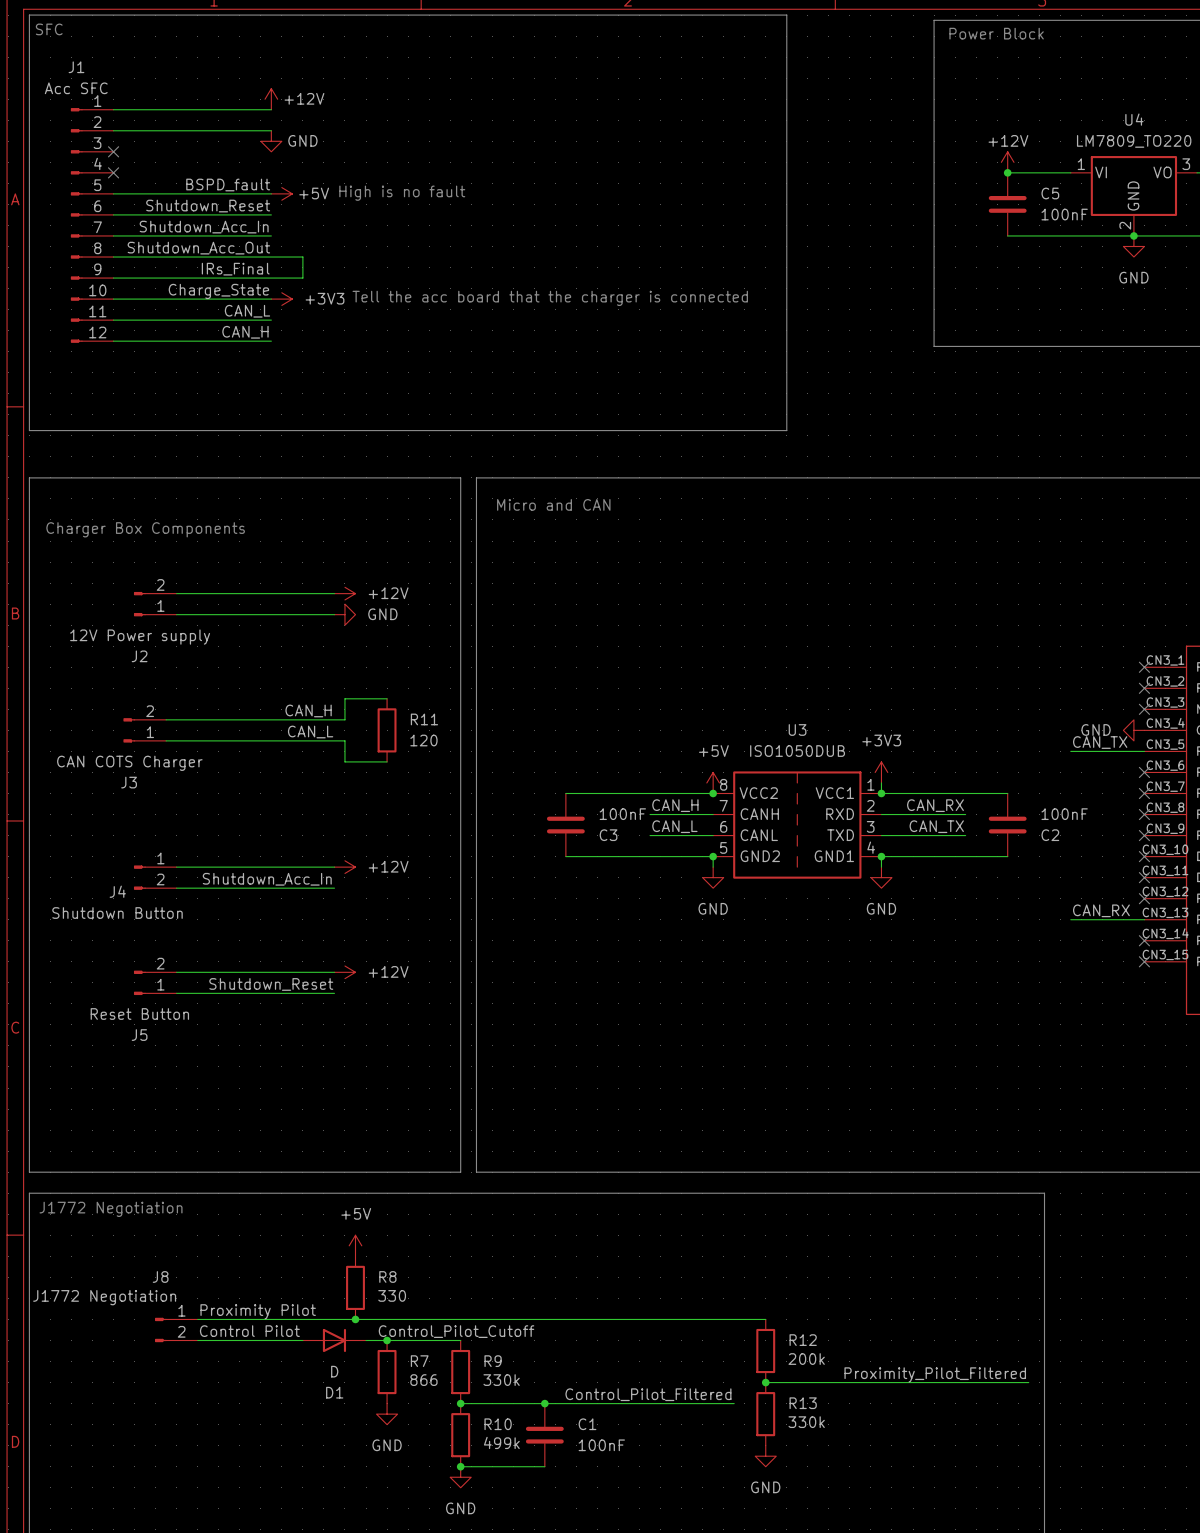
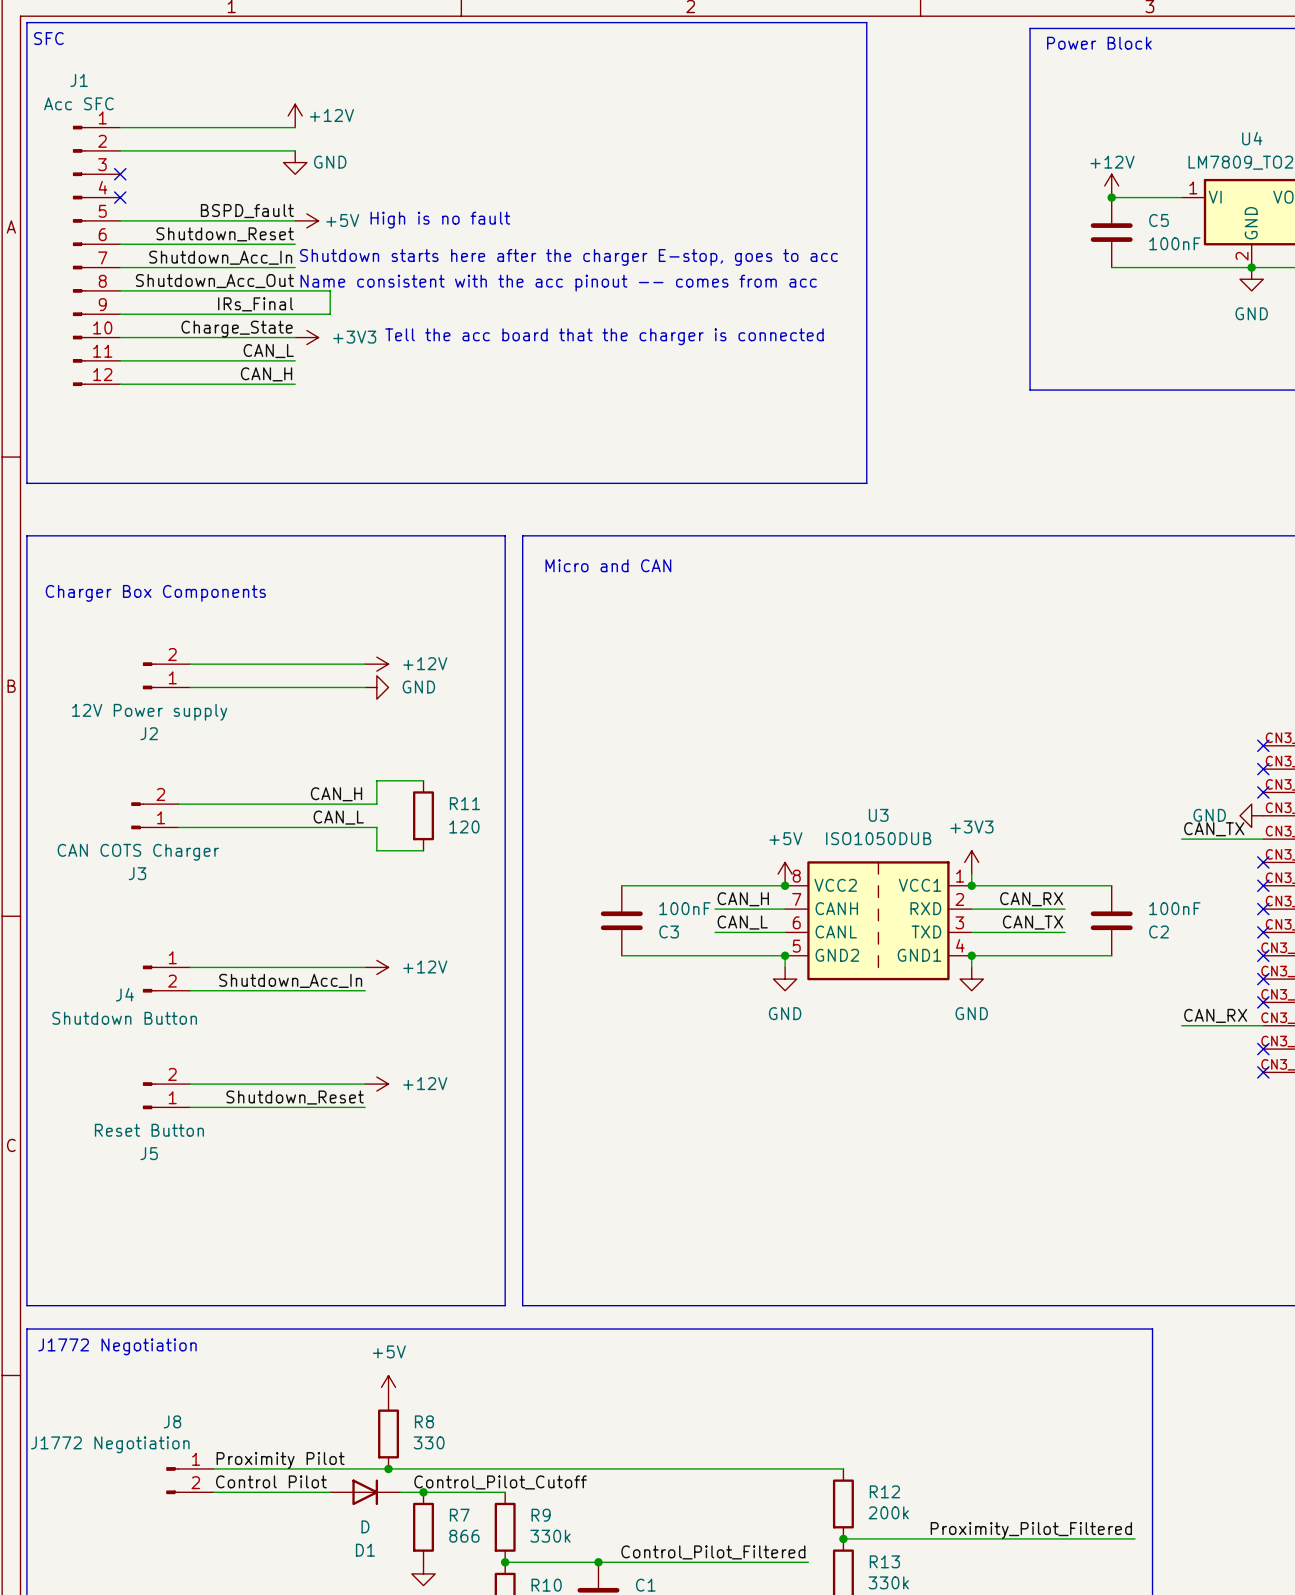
text: none -> Shutdown starts here after the charger E-stop, goes to acc (568, 257)
text: none -> Name consistent with the acc pinout -- comes from acc (558, 283)

